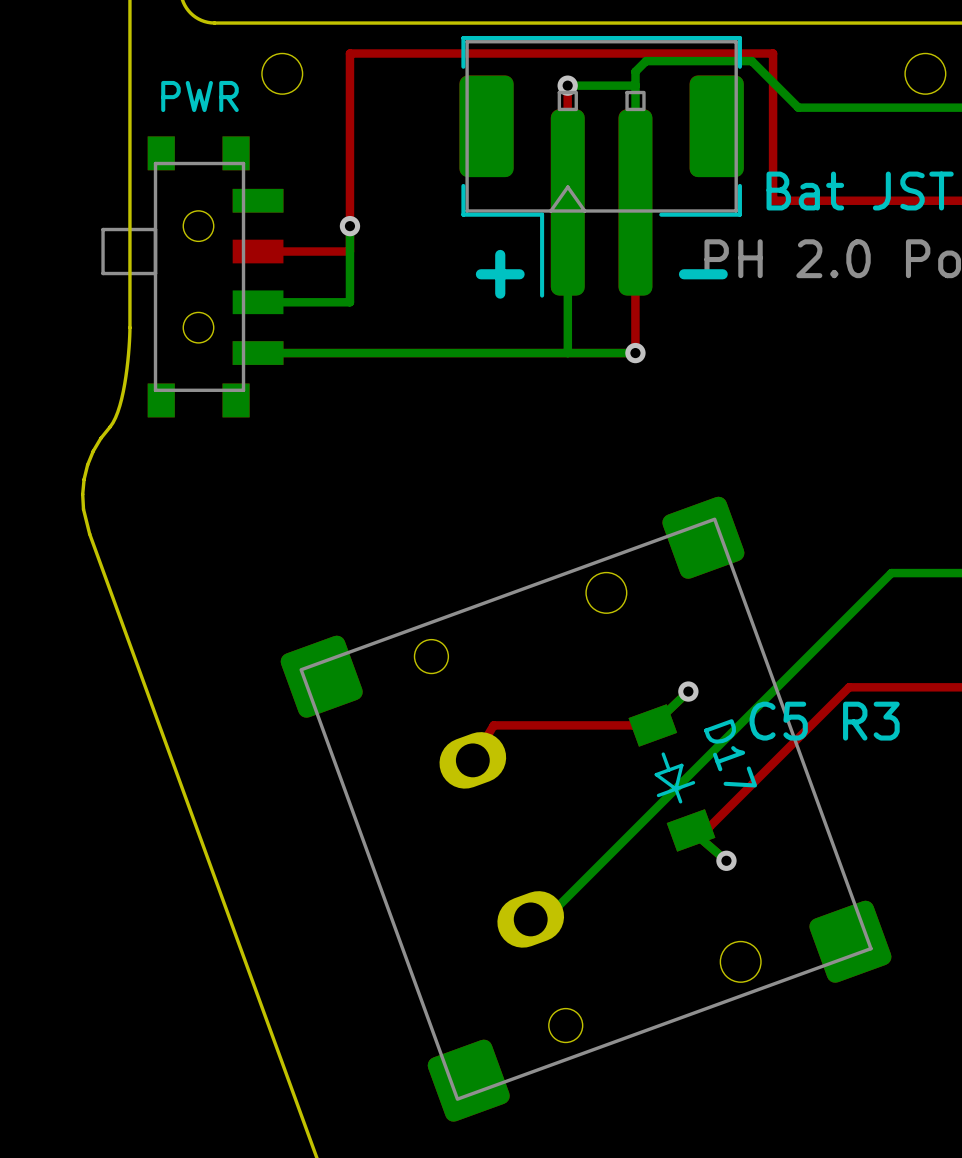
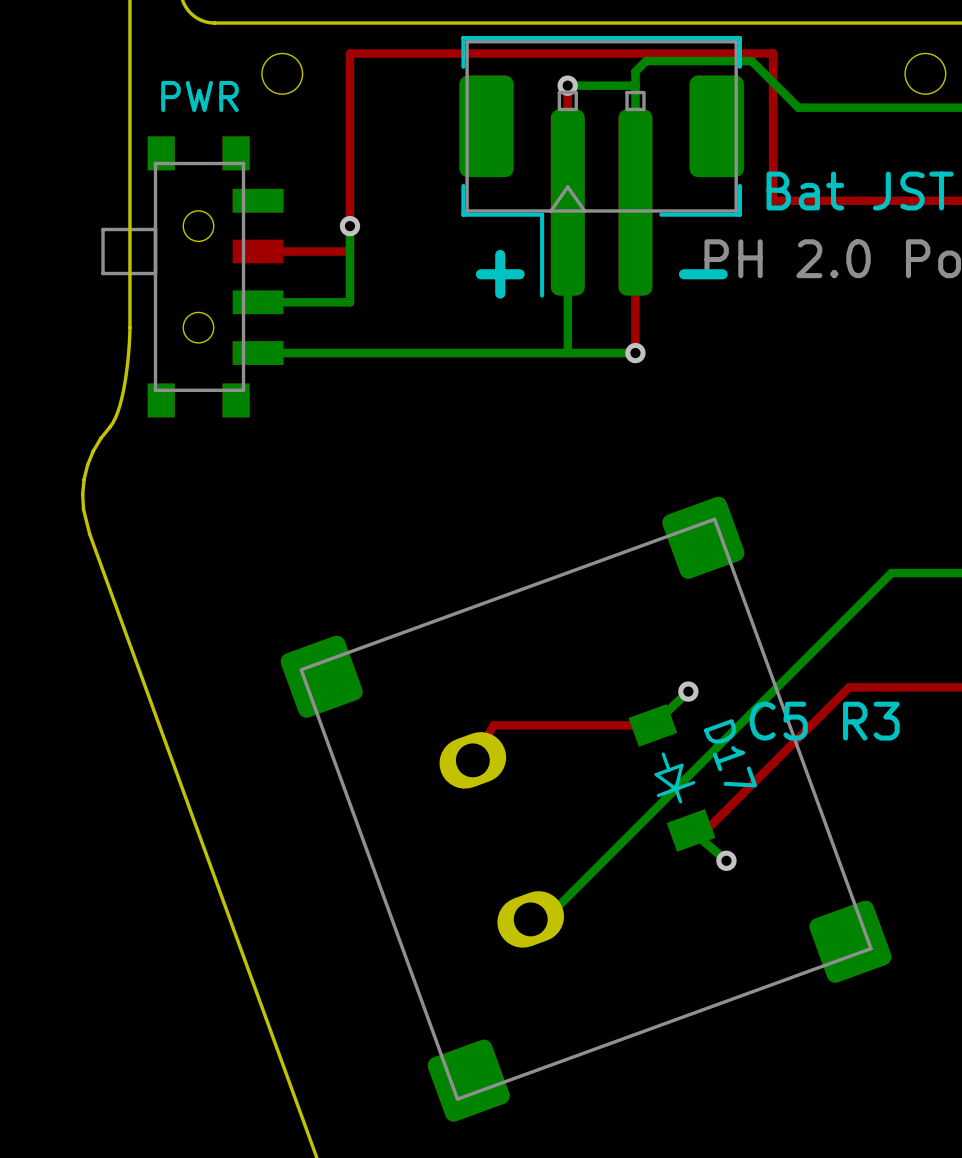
part footprint: [280, 496, 892, 1122] -> [280, 496, 892, 1122]

